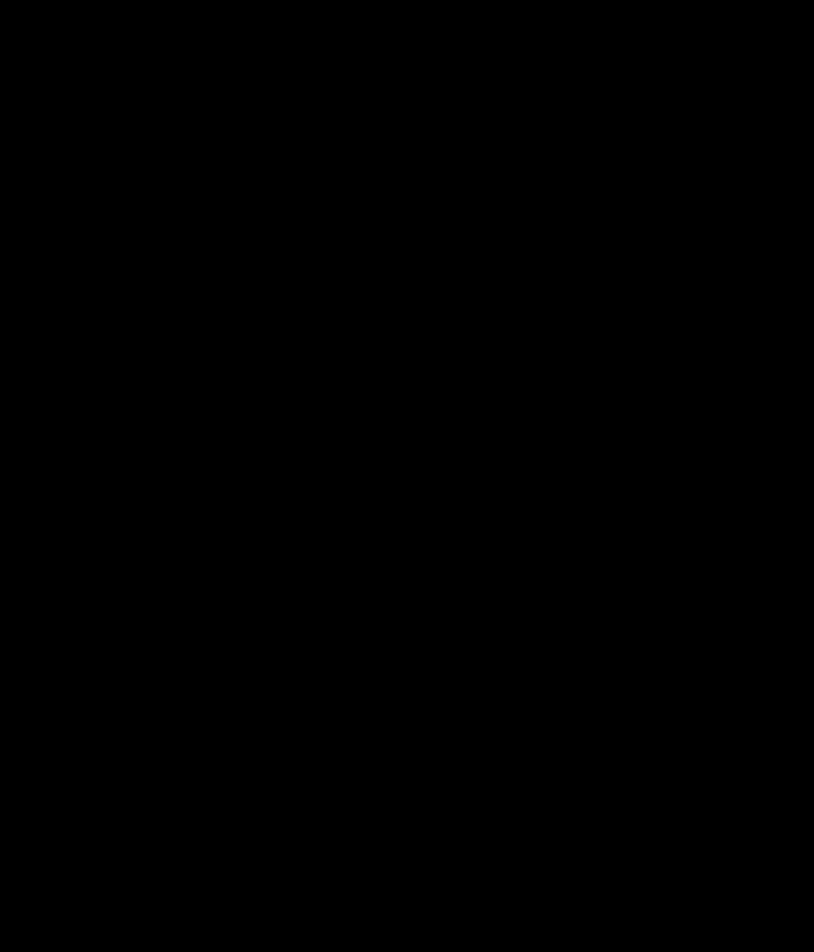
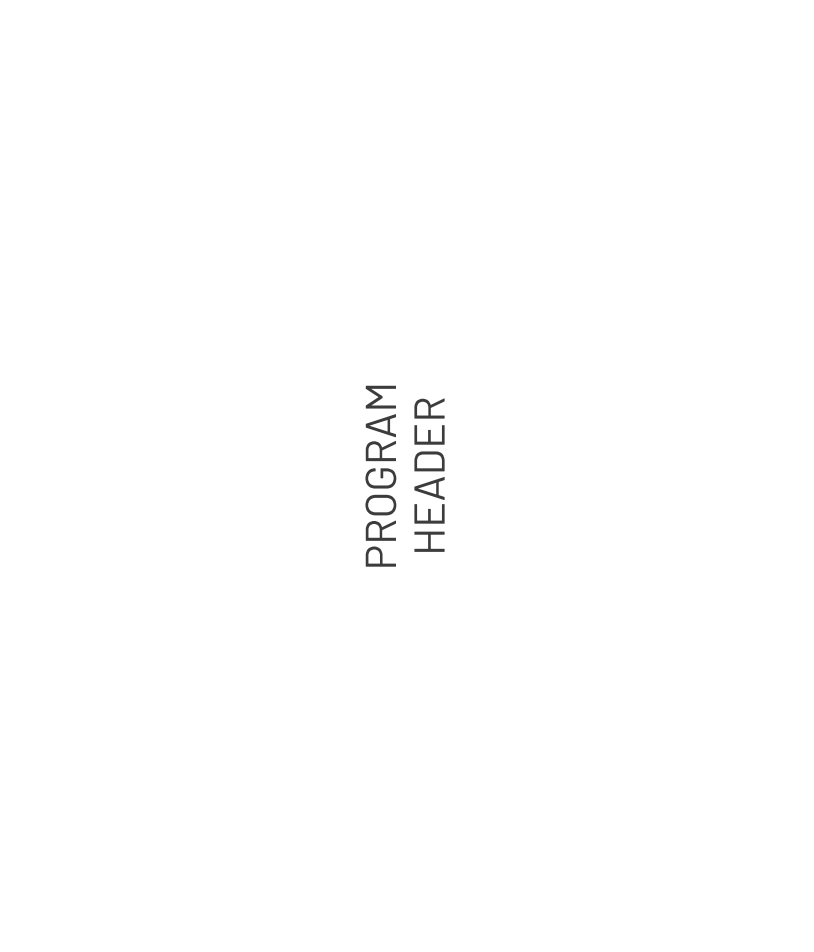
text: none -> HEADER (429, 475)
text: none -> PROGRAM (380, 476)

